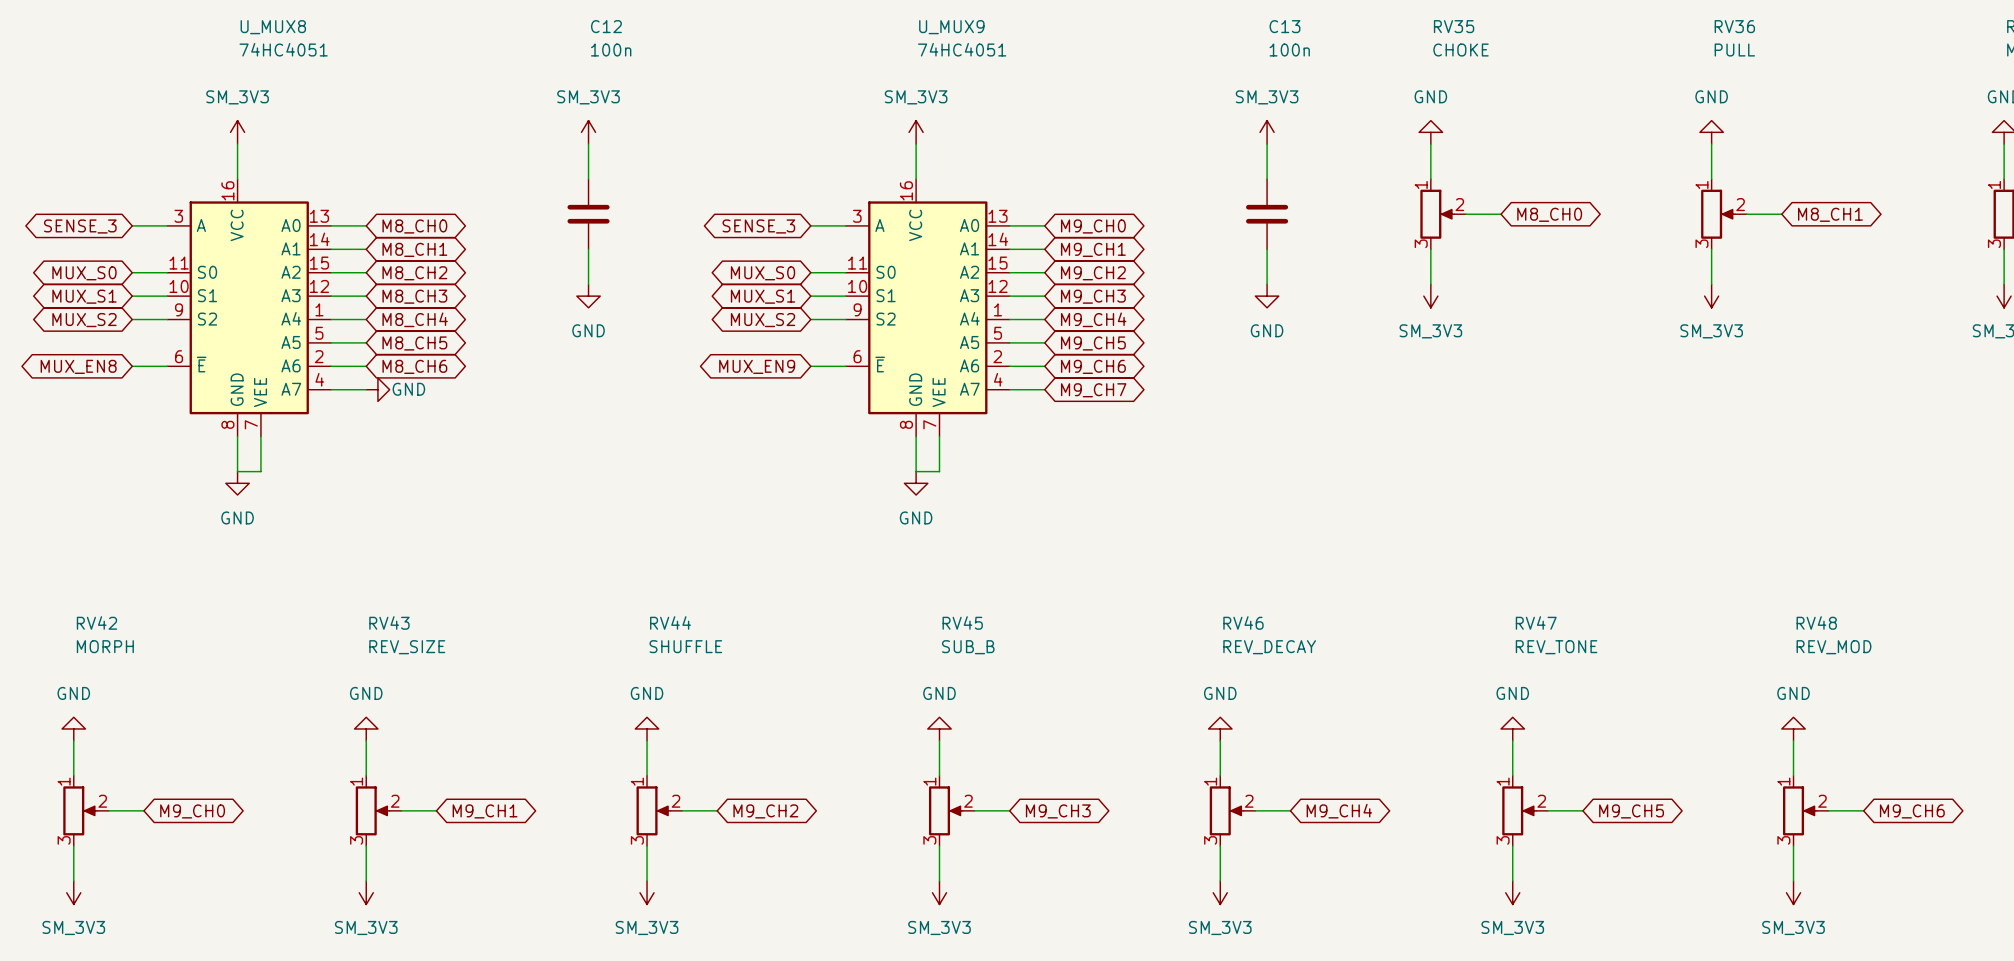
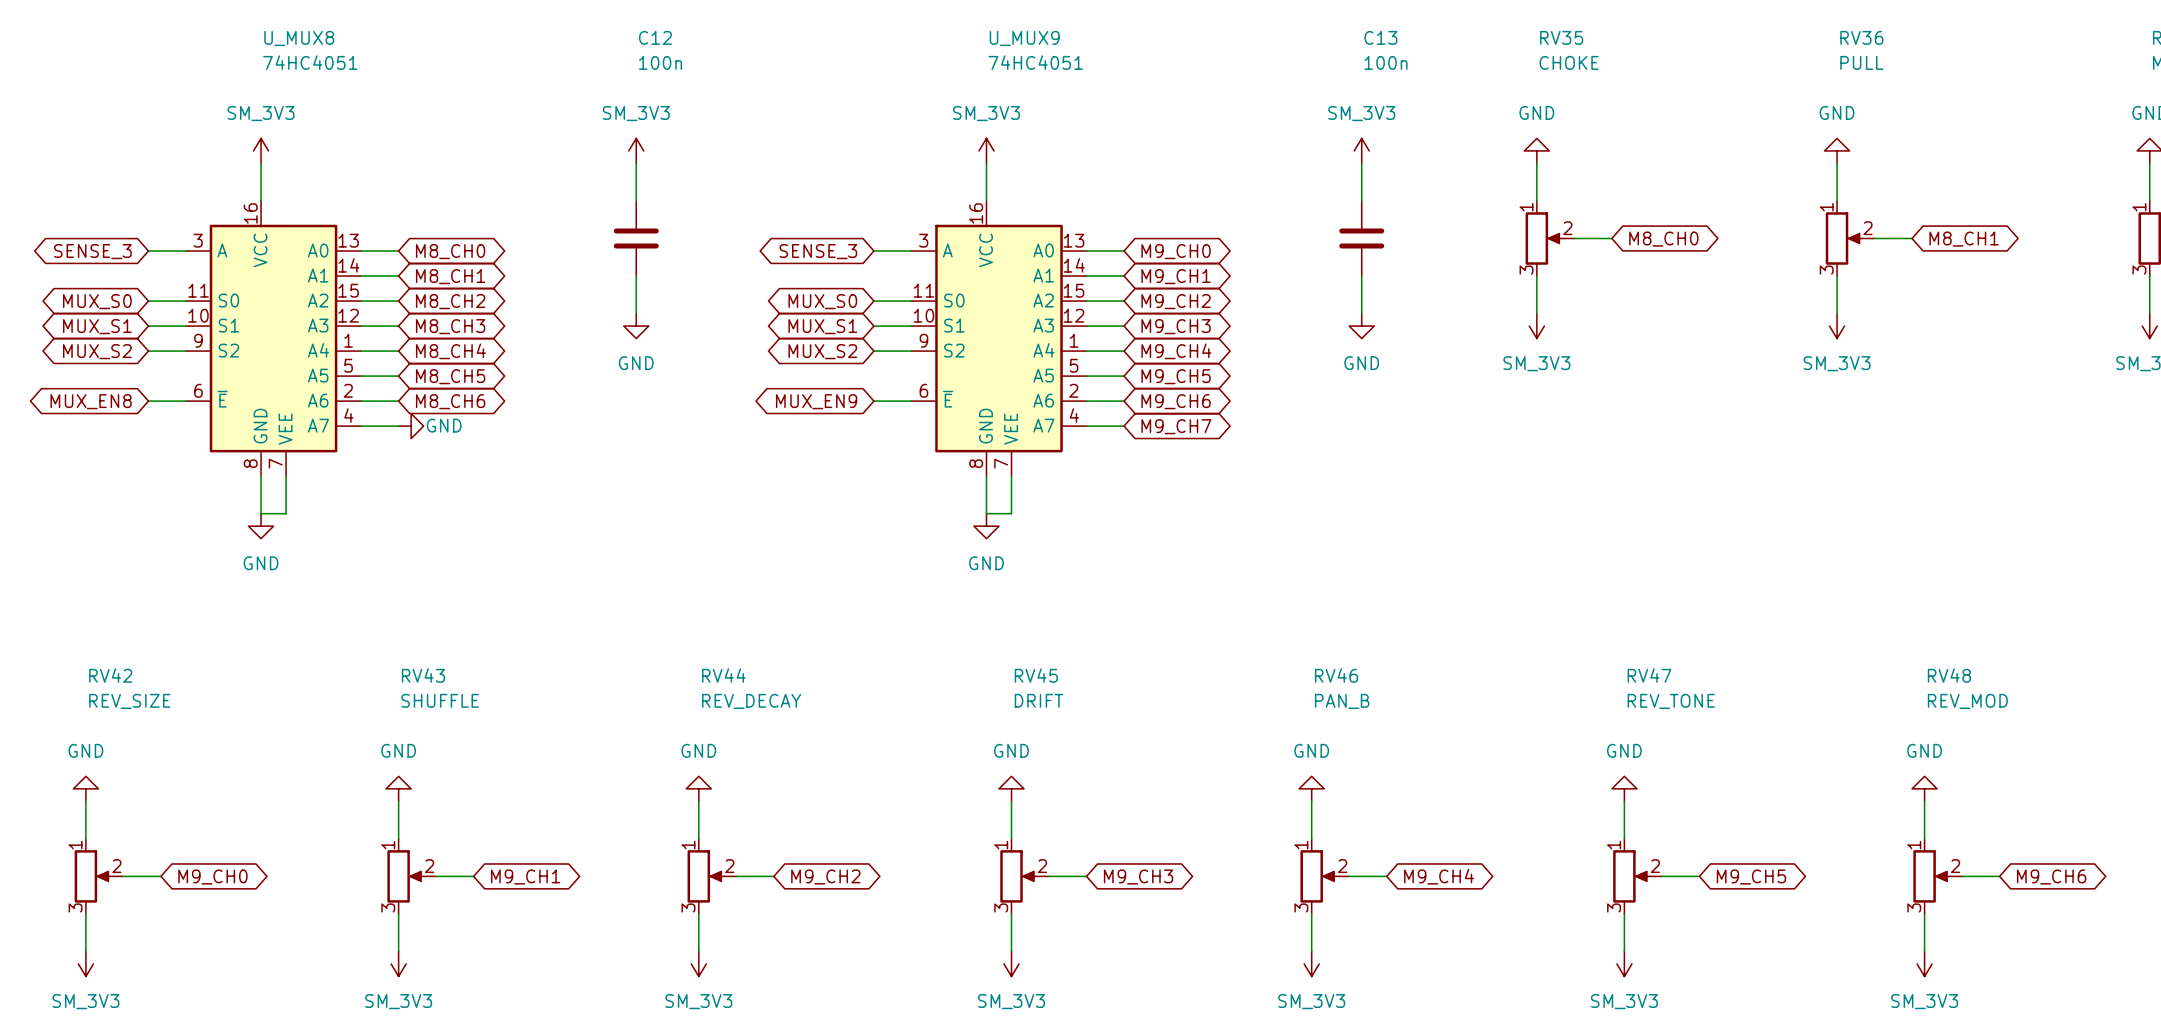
RV42 value: MORPH (105, 646) -> REV_SIZE (129, 701)
RV44 value: SHUFFLE (685, 646) -> REV_DECAY (751, 701)
RV43 value: REV_SIZE (407, 647) -> SHUFFLE (440, 700)
RV45 value: SUB_B (968, 647) -> DRIFT (1039, 700)
RV46 value: REV_DECAY (1269, 647) -> PAN_B (1342, 701)

